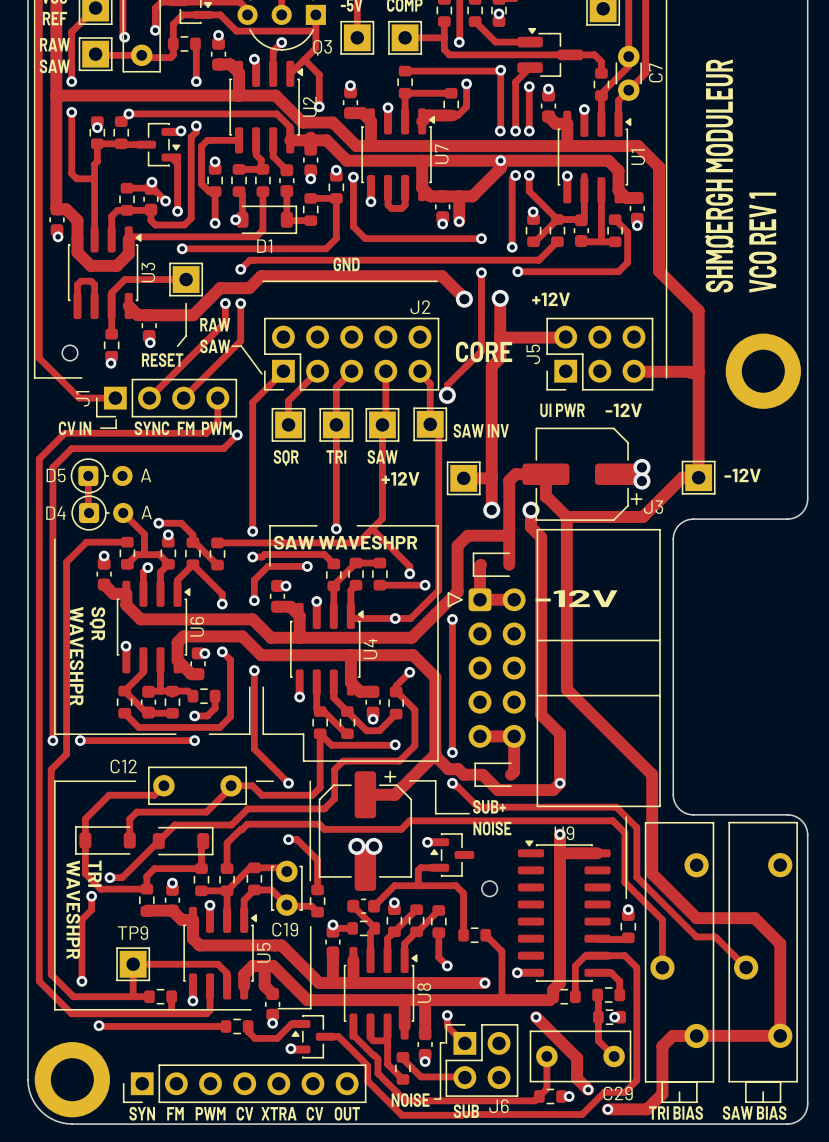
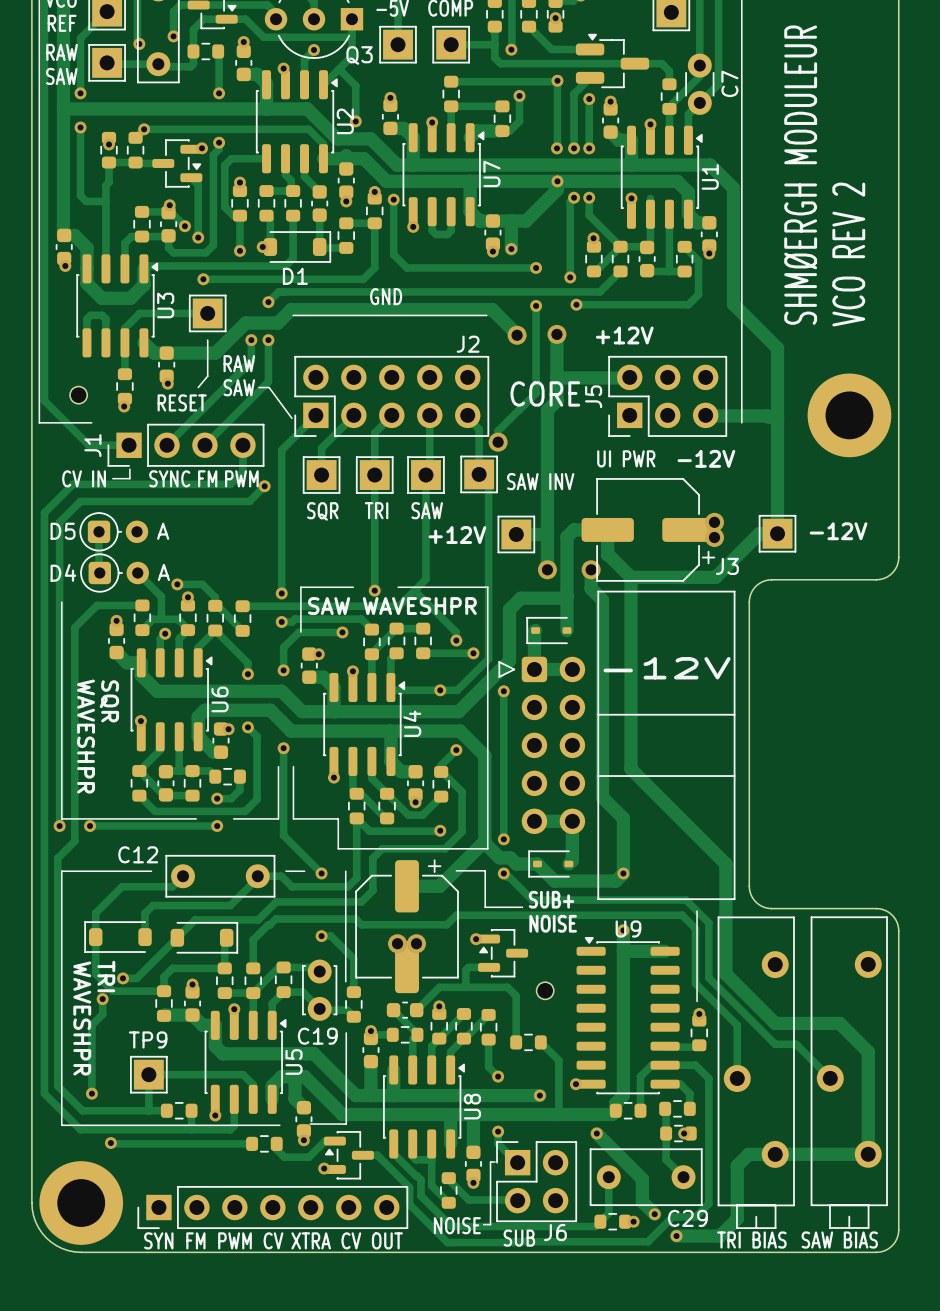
text: VCO REV 1 (762, 242) -> VCO REV 2 (848, 254)

